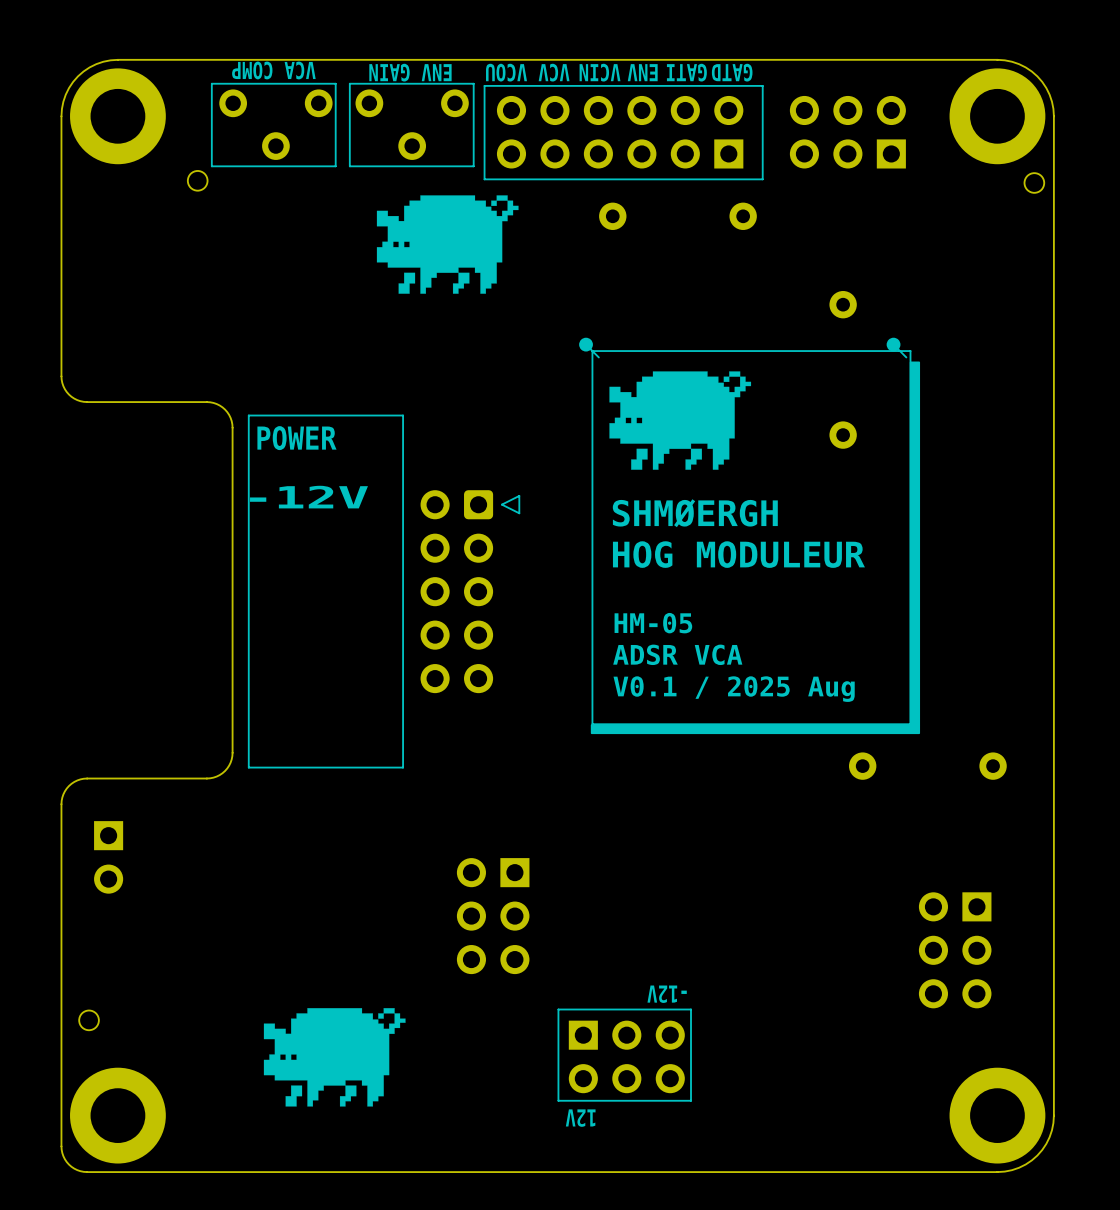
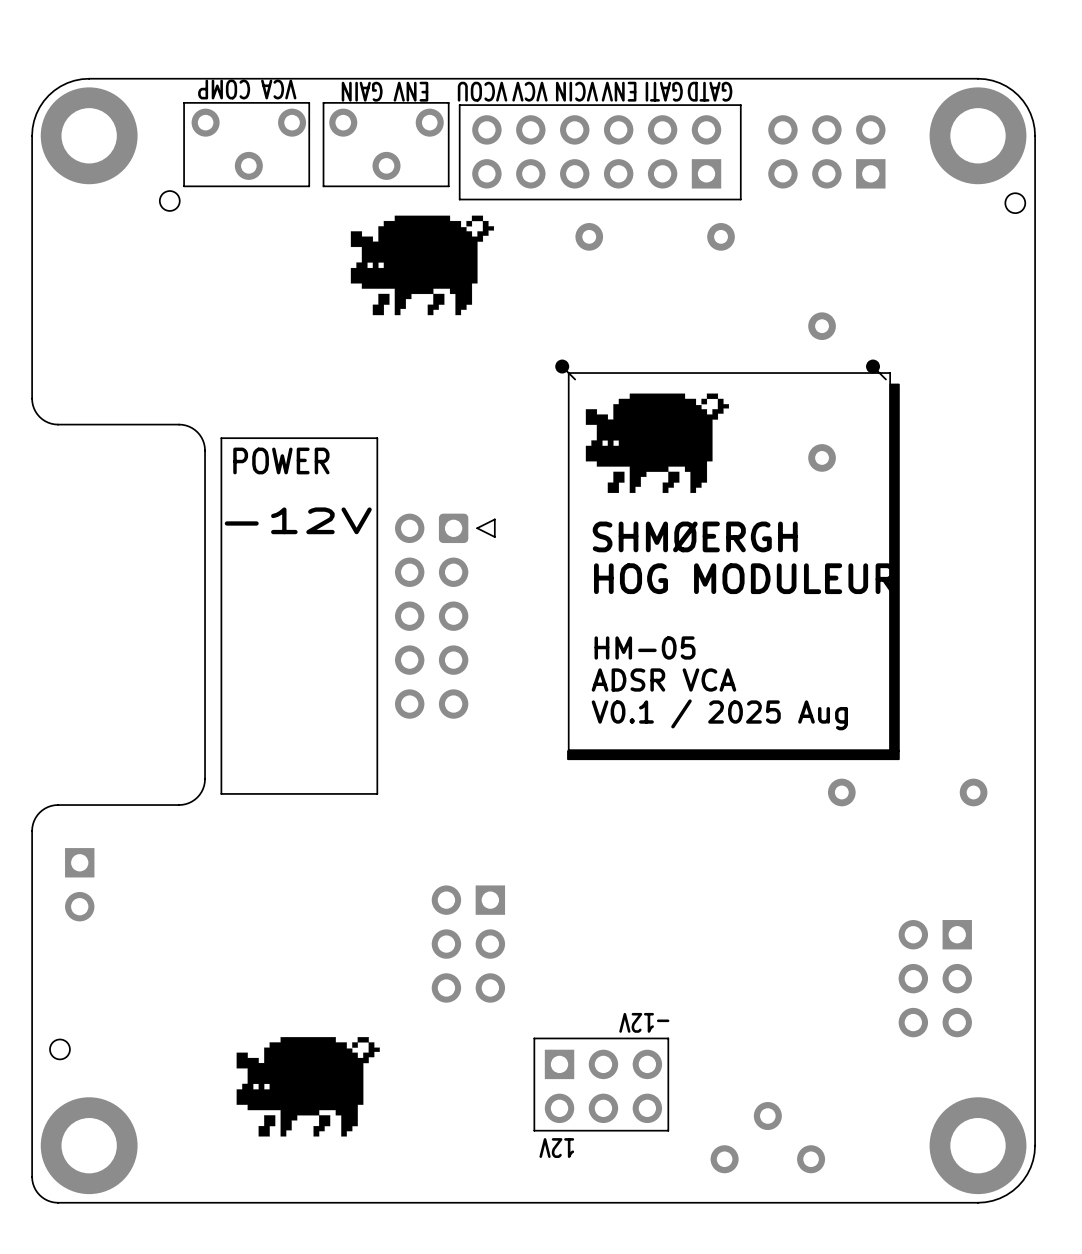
part: none -> (767, 1137)

